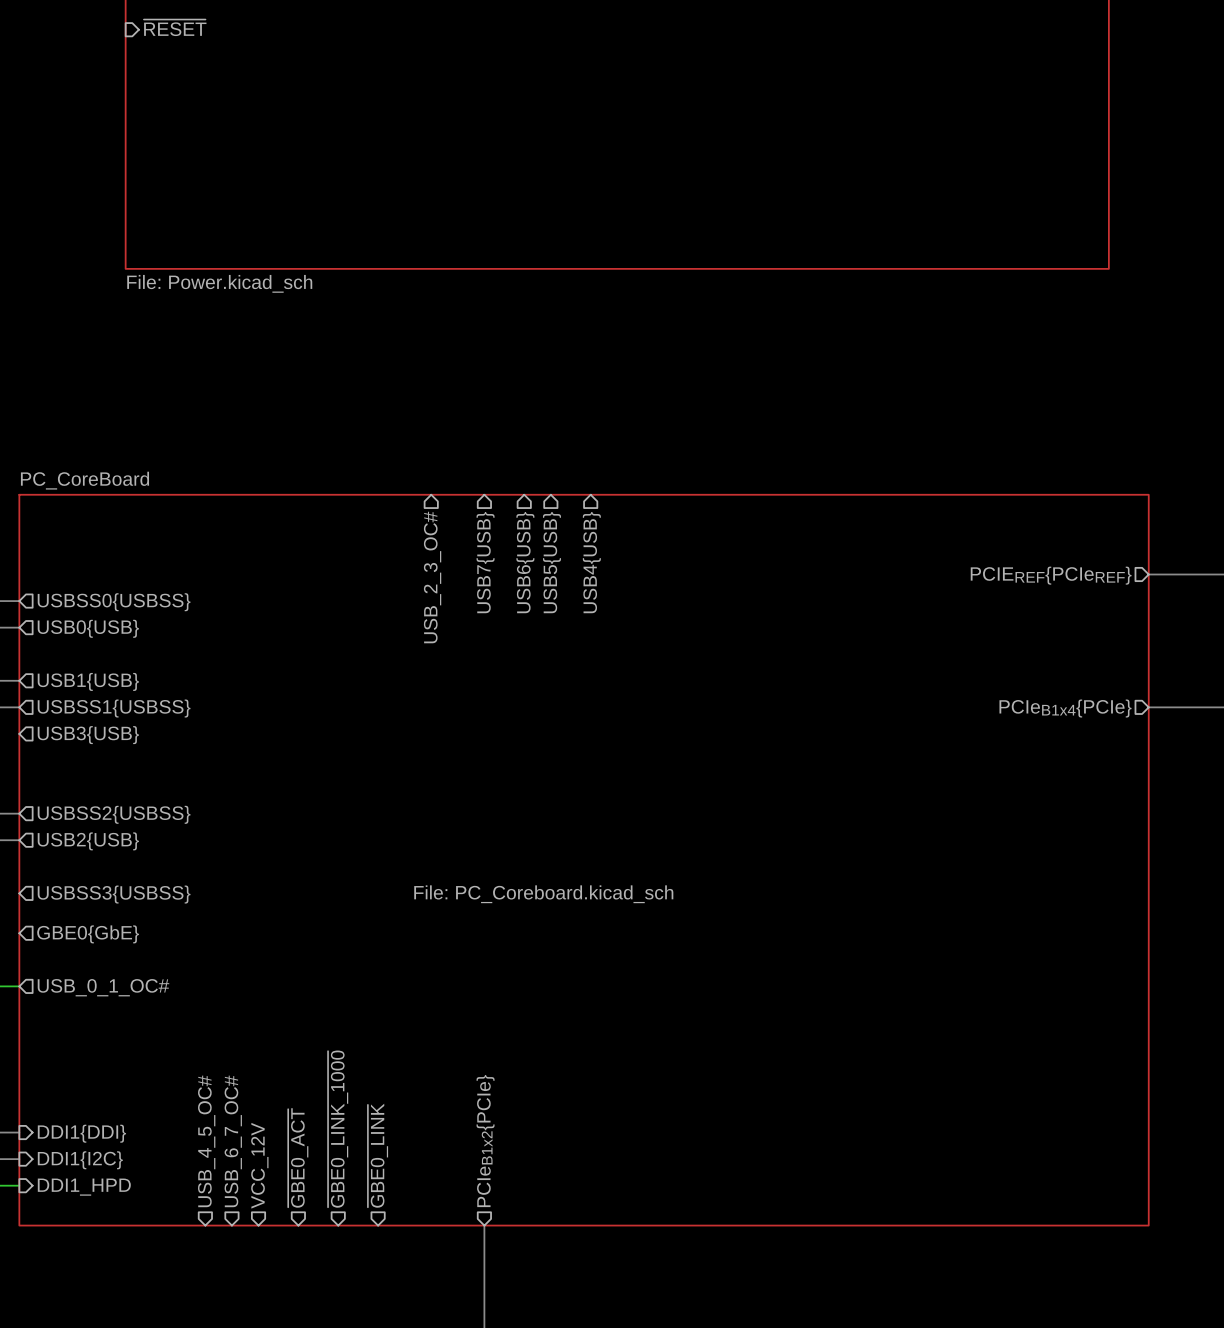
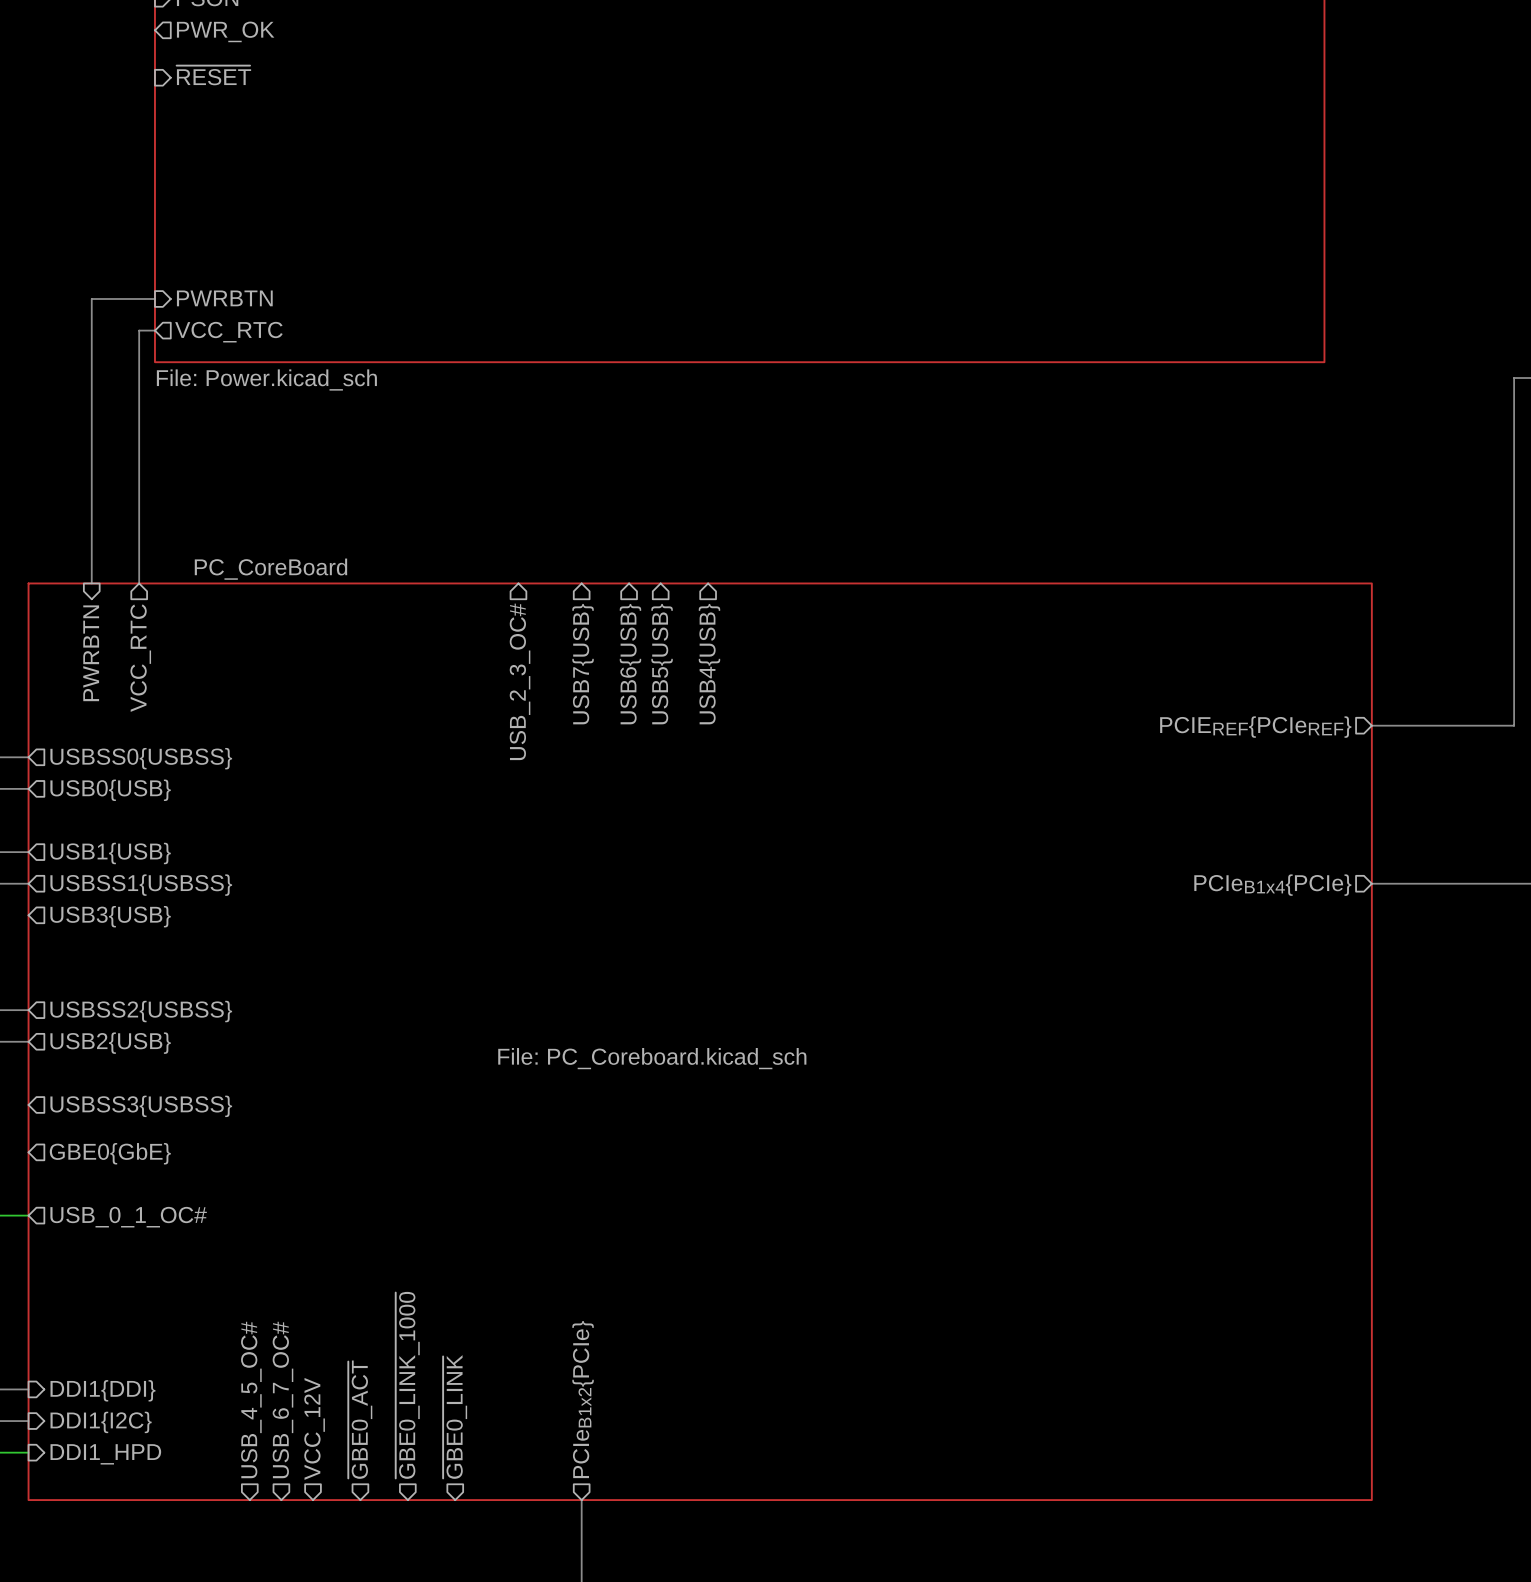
bus: none -> (154, 298) (91, 298) (91, 583)
sheet pin: none -> PWRBTN (224, 298)
bus: none -> (154, 330) (139, 330) (139, 583)
sheet pin: none -> VCC_RTC (228, 332)
sheet pin: none -> PWRBTN (91, 653)
sheet pin: none -> VCC_RTC (140, 658)
sheet pin position: USB7{USB} (485, 562) -> USB7{USB} (583, 664)
sheet pin position: USB6{USB} (525, 562) -> USB6{USB} (630, 664)
sheet pin position: USB5{USB} (551, 562) -> USB5{USB} (662, 664)
sheet pin position: USB4{USB} (591, 562) -> USB4{USB} (709, 664)
sheet pin position: USB_2_3_OC# (432, 577) -> USB_2_3_OC# (520, 681)
sheet PC_CoreBoard: none -> File: PC_Coreboard.kicad_sch (700, 1041)
sheet PC_CoreBoard: File: PC_Coreboard.kicad_sch (584, 860) -> none

